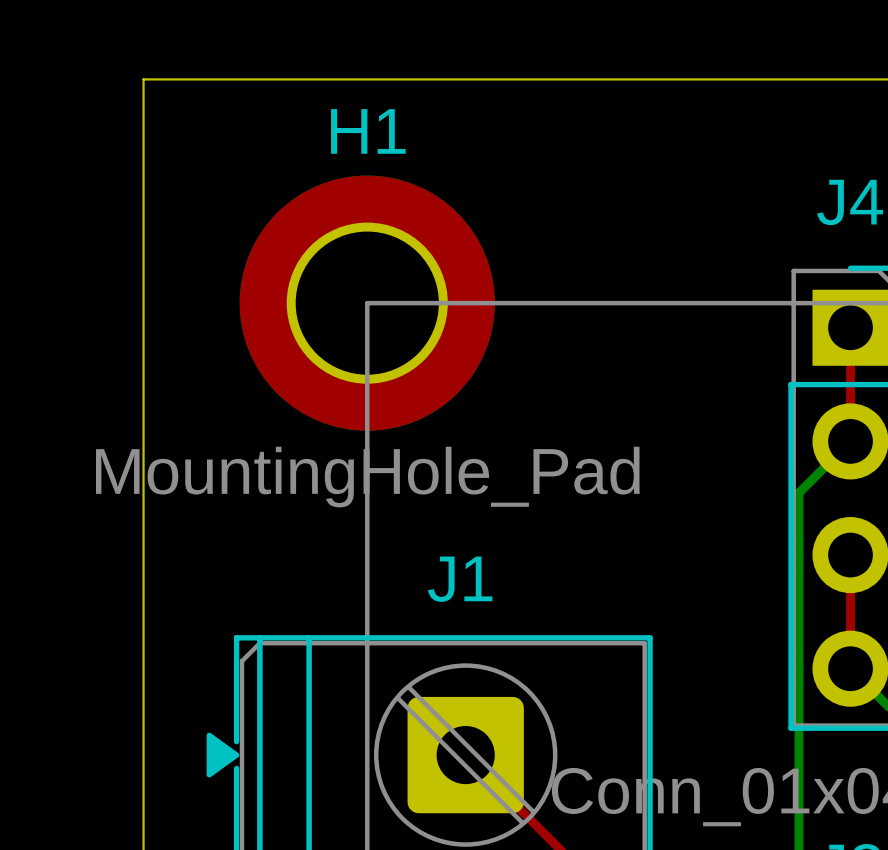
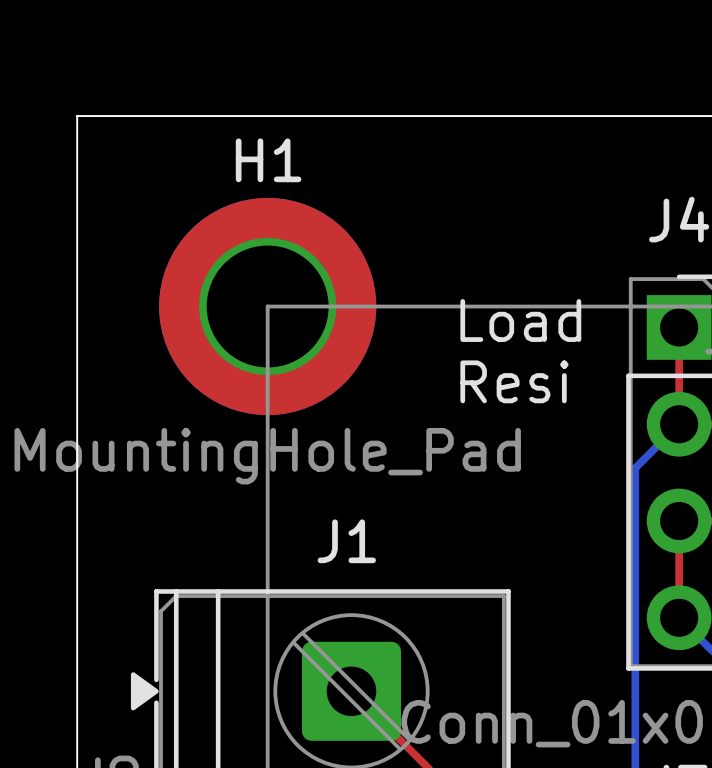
text: none -> Load (520, 320)
text: none -> Resi (514, 381)

